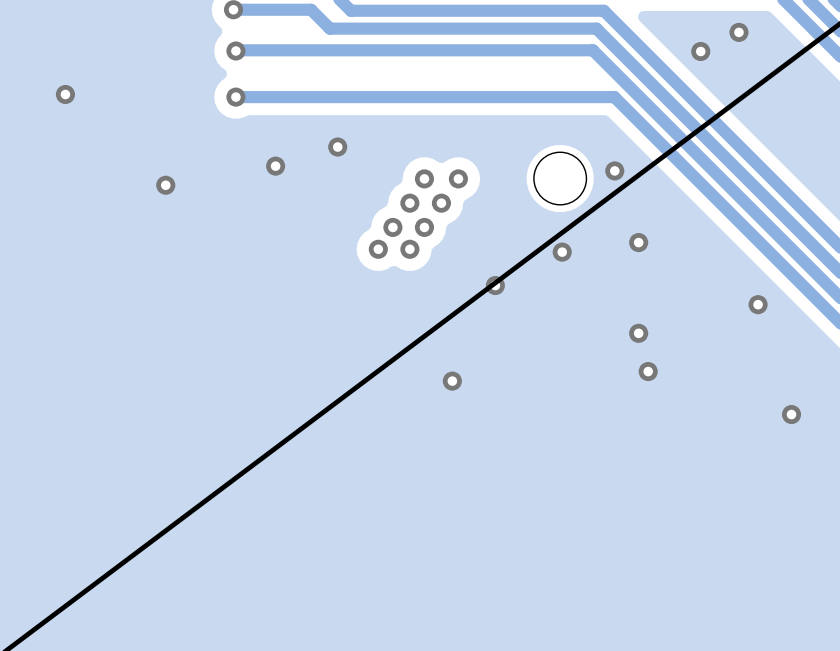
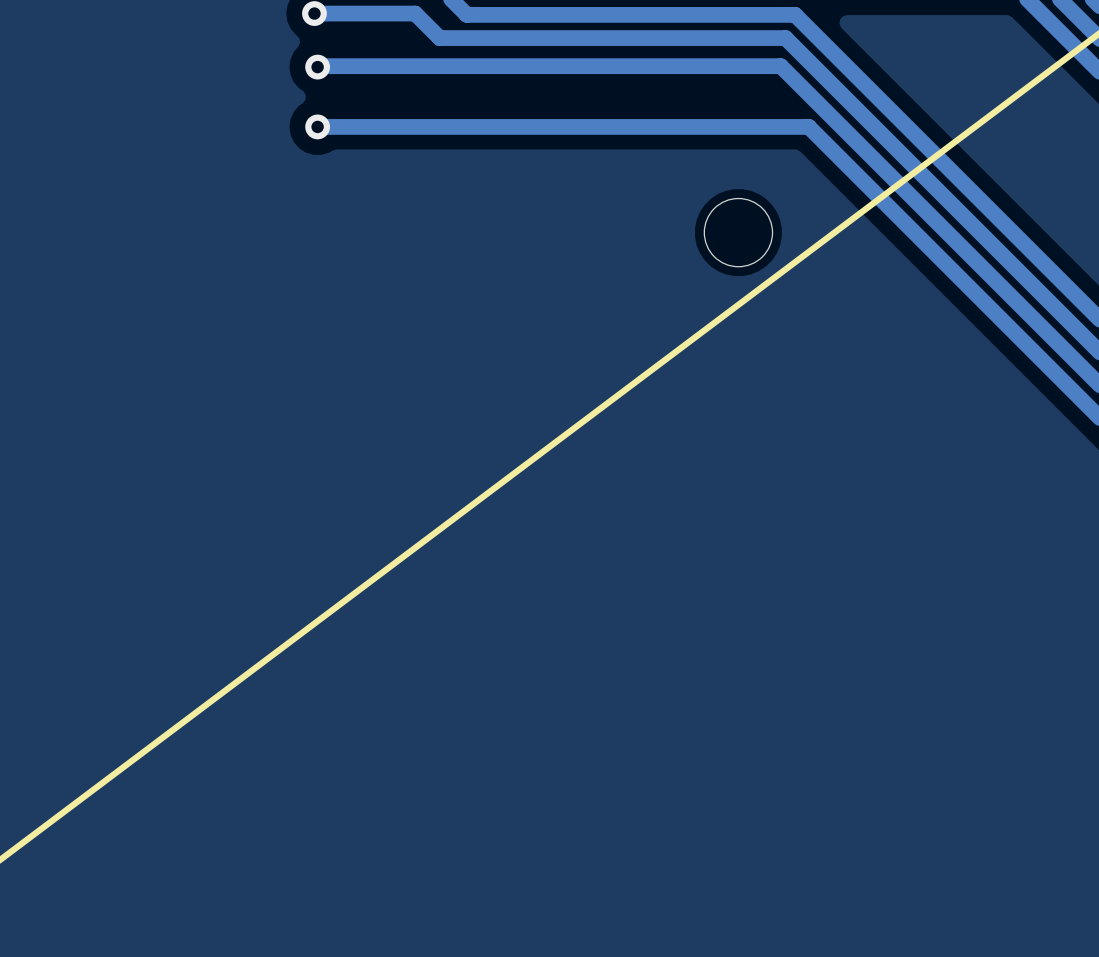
via: (738, 32) -> none
via: (700, 51) -> none
via: (65, 94) -> none
via: (337, 147) -> none
via: (275, 166) -> none
via: (614, 170) -> none
via: (424, 178) -> none
via: (458, 178) -> none
via: (165, 185) -> none
via: (409, 203) -> none
via: (441, 203) -> none
via: (392, 227) -> none
via: (424, 227) -> none
via: (638, 242) -> none
via: (378, 249) -> none
via: (409, 249) -> none
via: (562, 252) -> none
via: (495, 285) -> none
via: (758, 304) -> none
via: (638, 333) -> none
via: (648, 371) -> none
via: (452, 381) -> none
via: (791, 414) -> none

